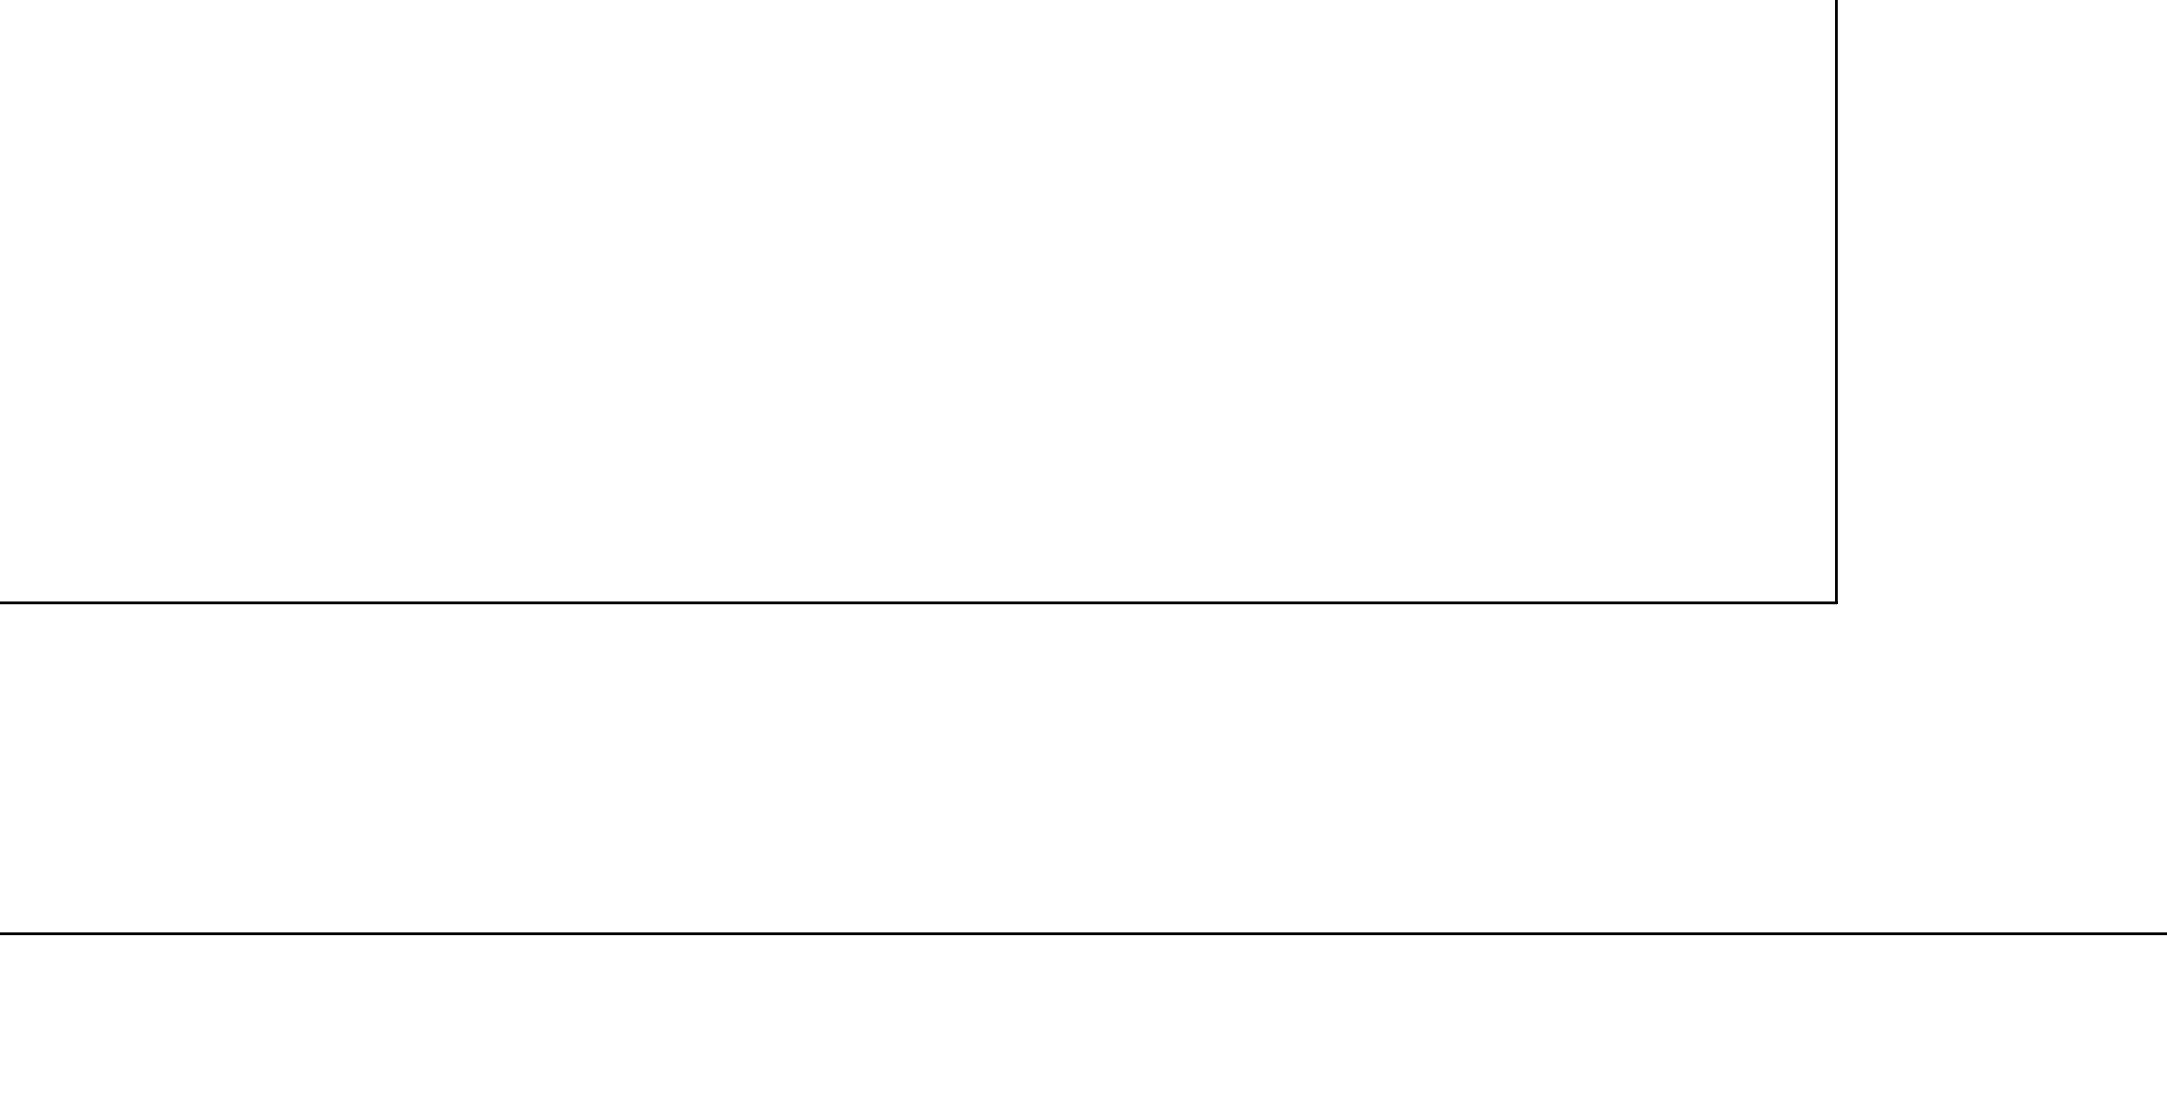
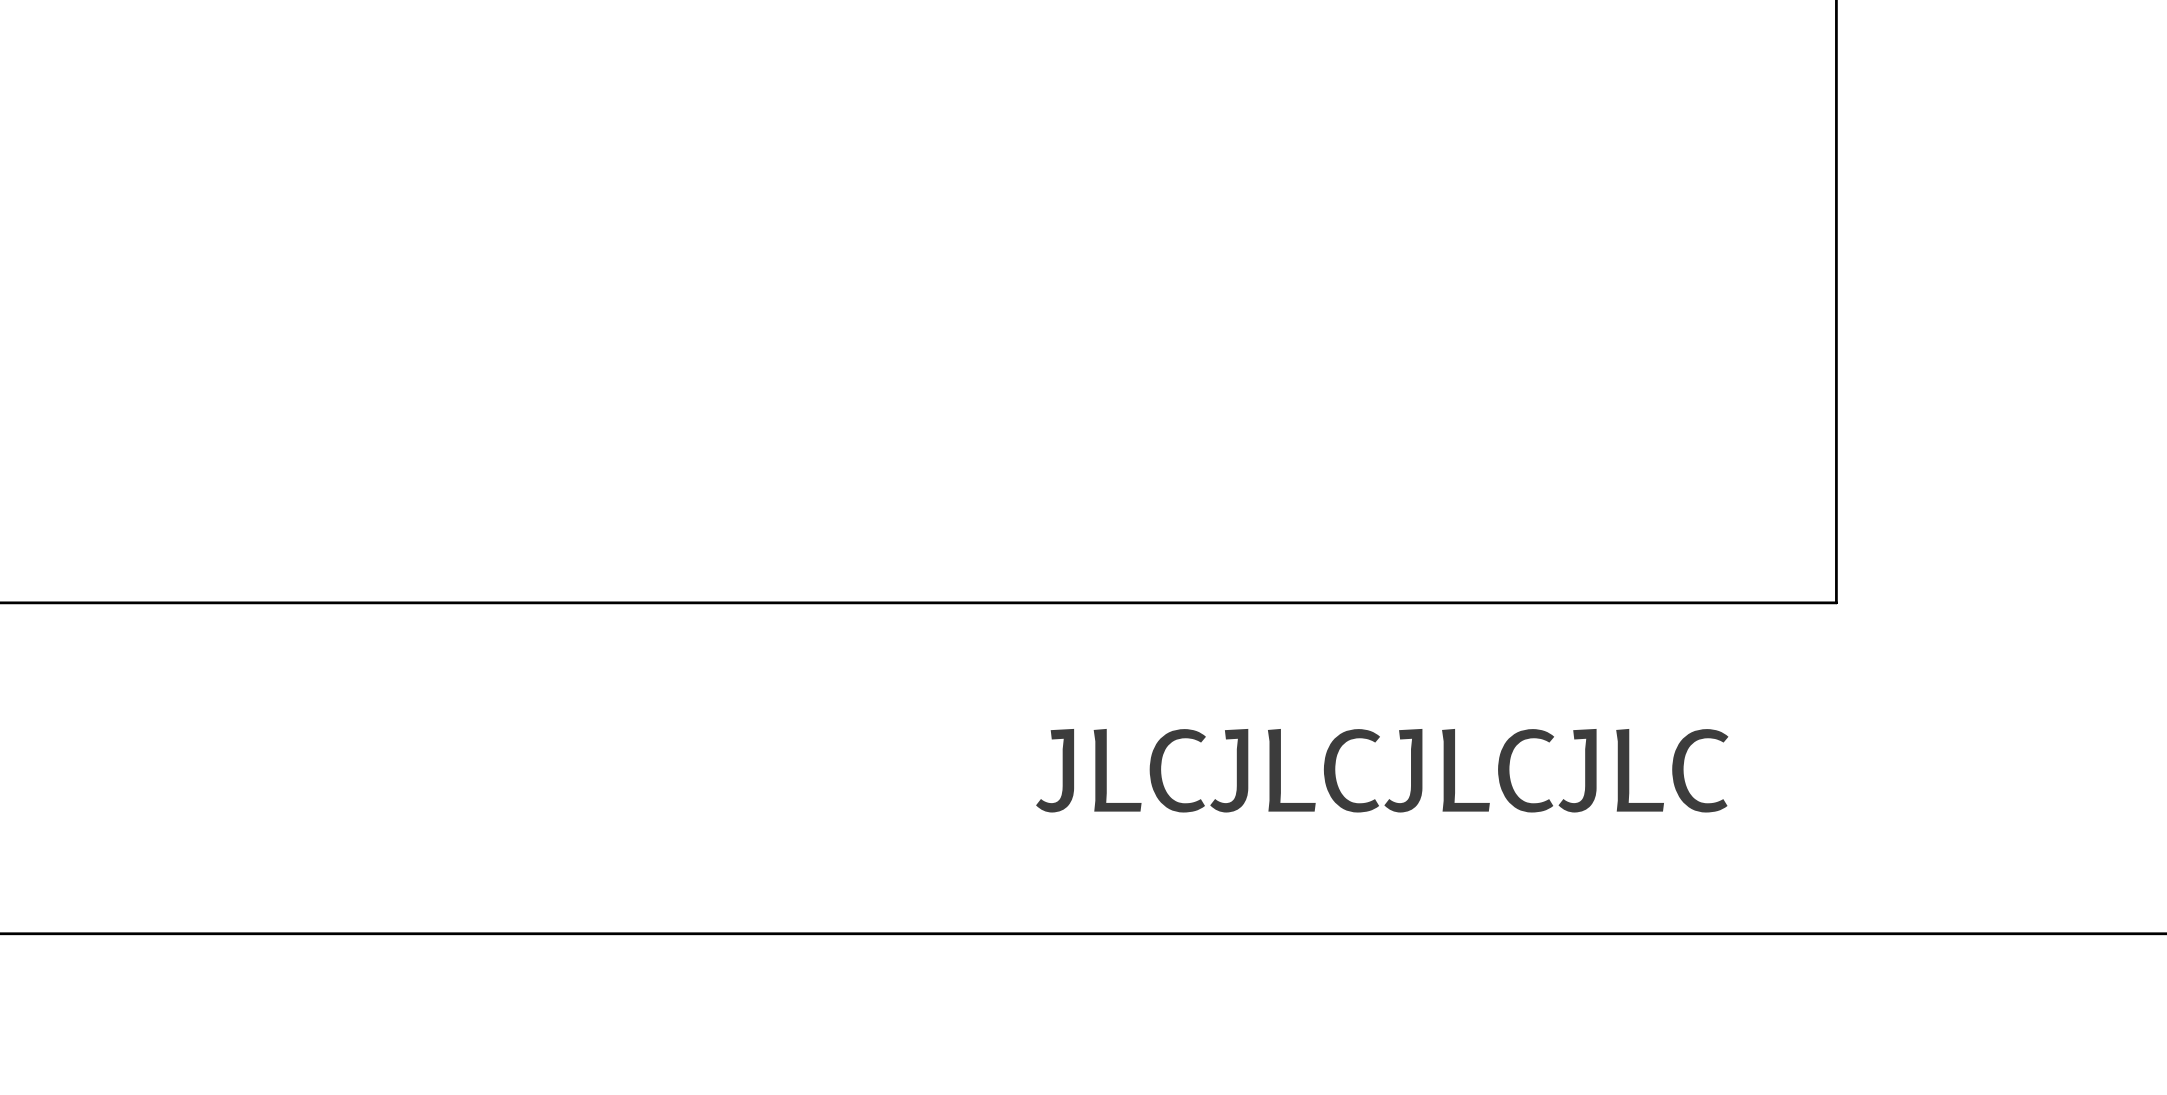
text: none -> JLCJLCJLCJLC (1382, 770)

